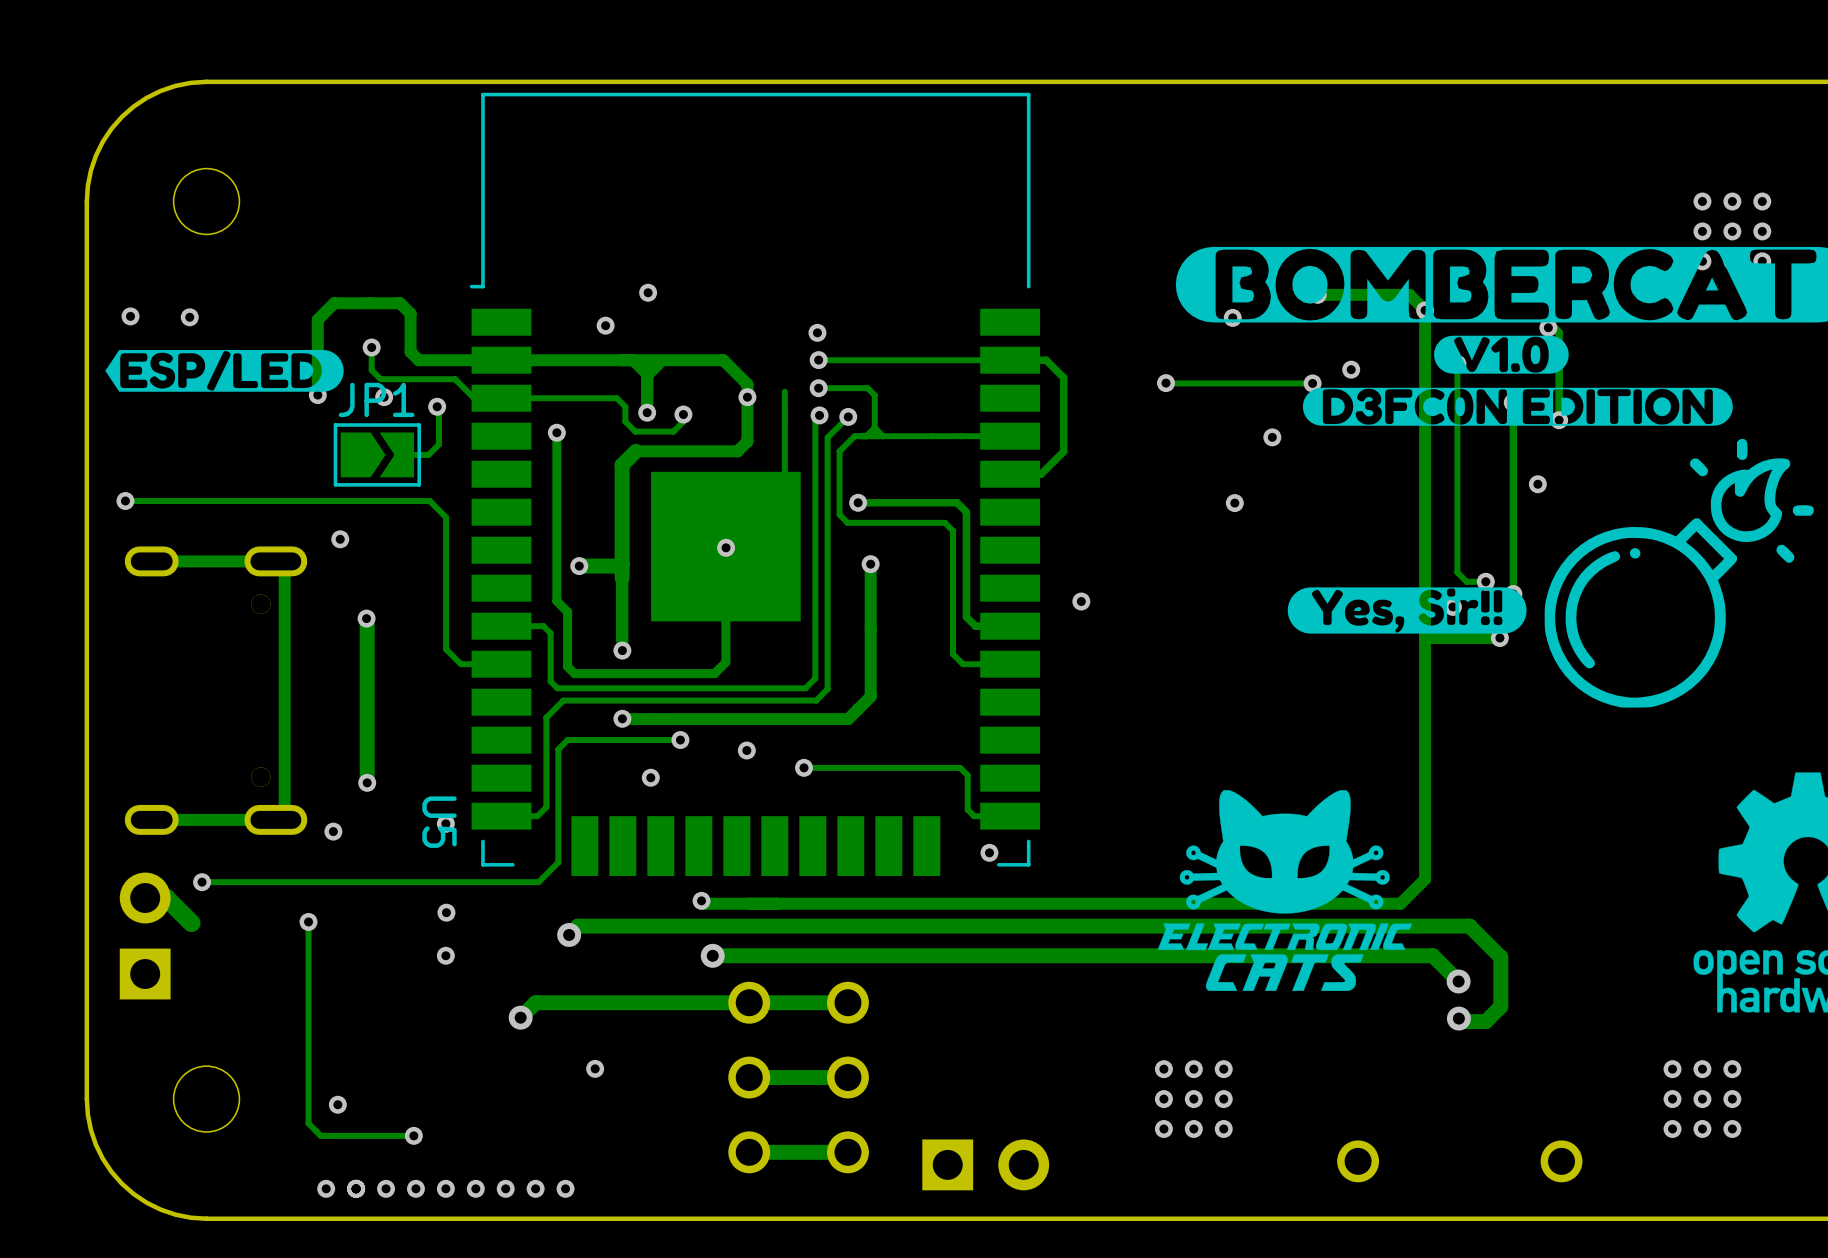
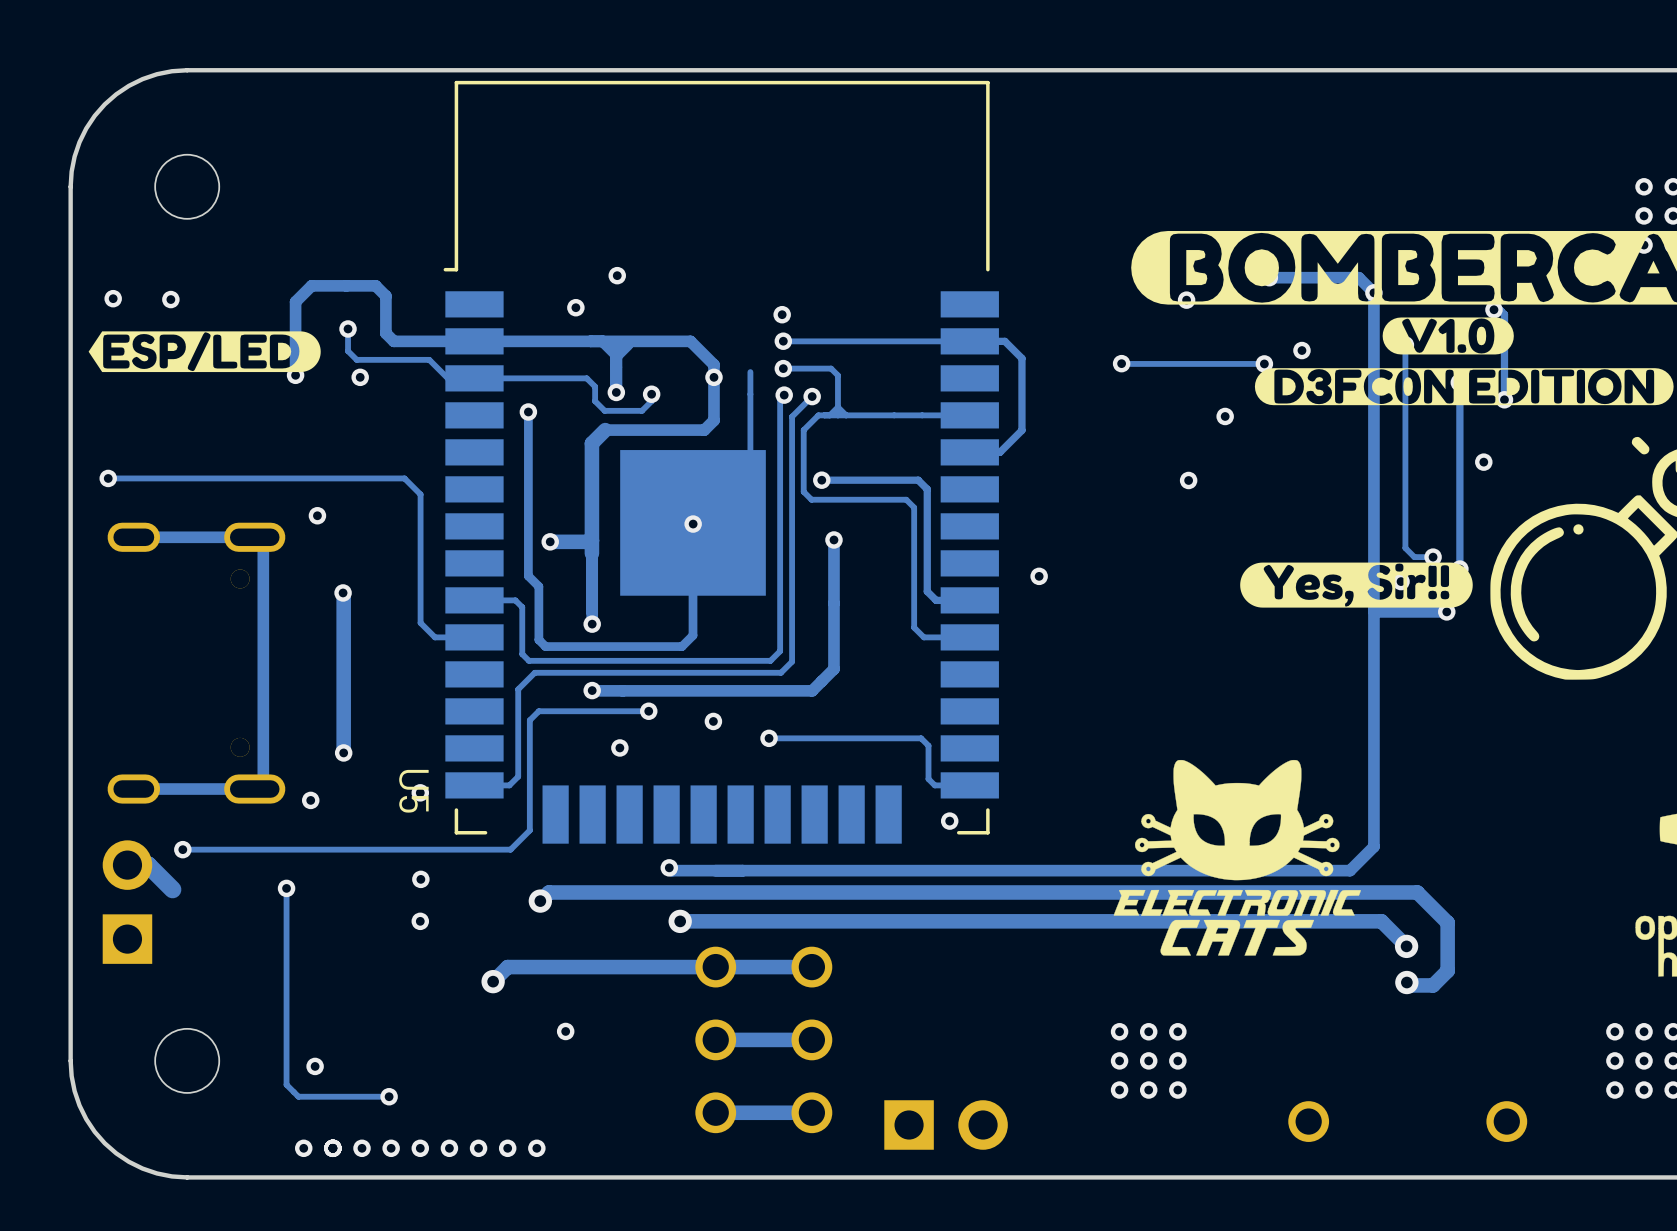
track: (437, 406) (438, 408) (438, 444) (428, 454) (399, 454) -> none
via: (437, 406) -> none
JP1: (377, 454) -> none

